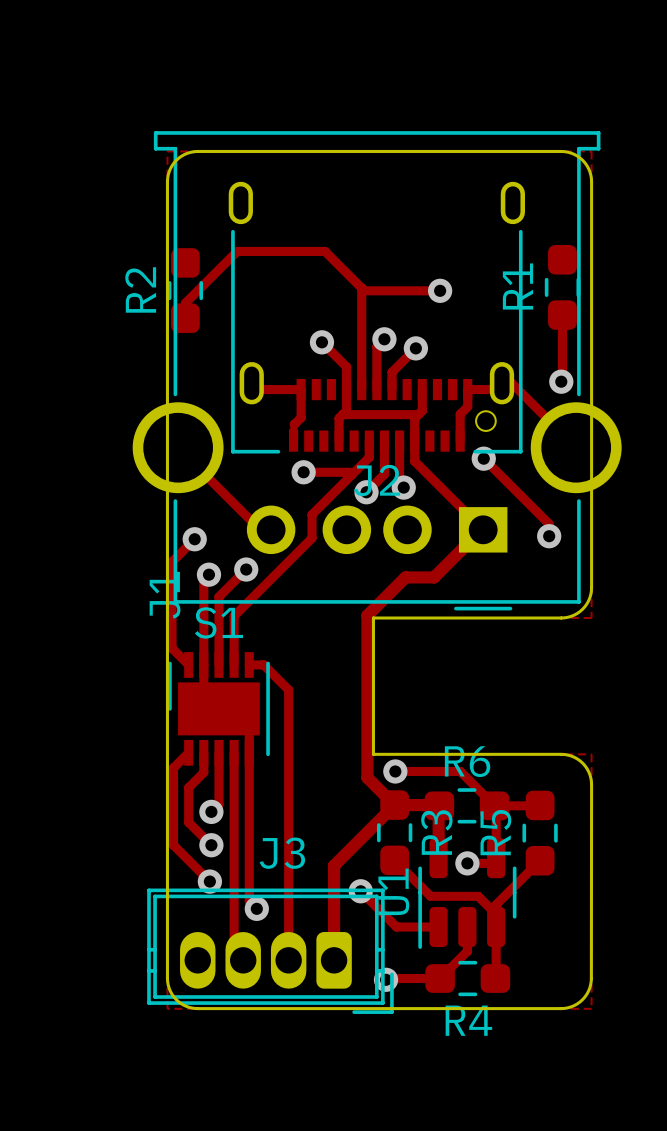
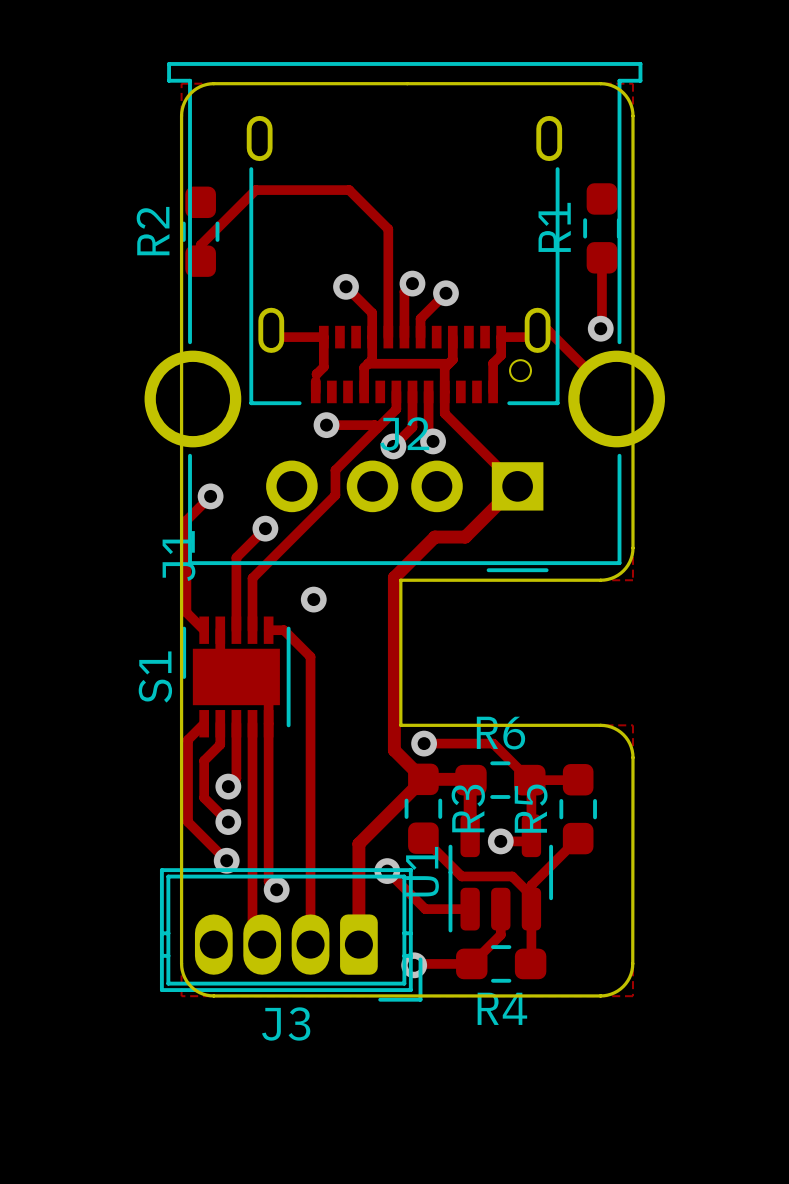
track: (361, 288) (364, 290) (440, 290) -> none
via: (440, 290) -> none
track: (178, 447) (260, 529) (271, 529) -> none
track: (483, 458) (549, 524) (549, 536) -> none
via: (483, 458) -> none
via: (549, 536) -> none
track: (208, 574) (203, 579) (203, 664) -> none
via position: (208, 574) -> (313, 599)
S1 name rotation: 0° (218, 622) -> 90° counterclockwise (155, 677)
S1 name position: S1 (218, 622) -> S1 (155, 677)
J3 name position: J3 (282, 853) -> J3 (286, 1024)

